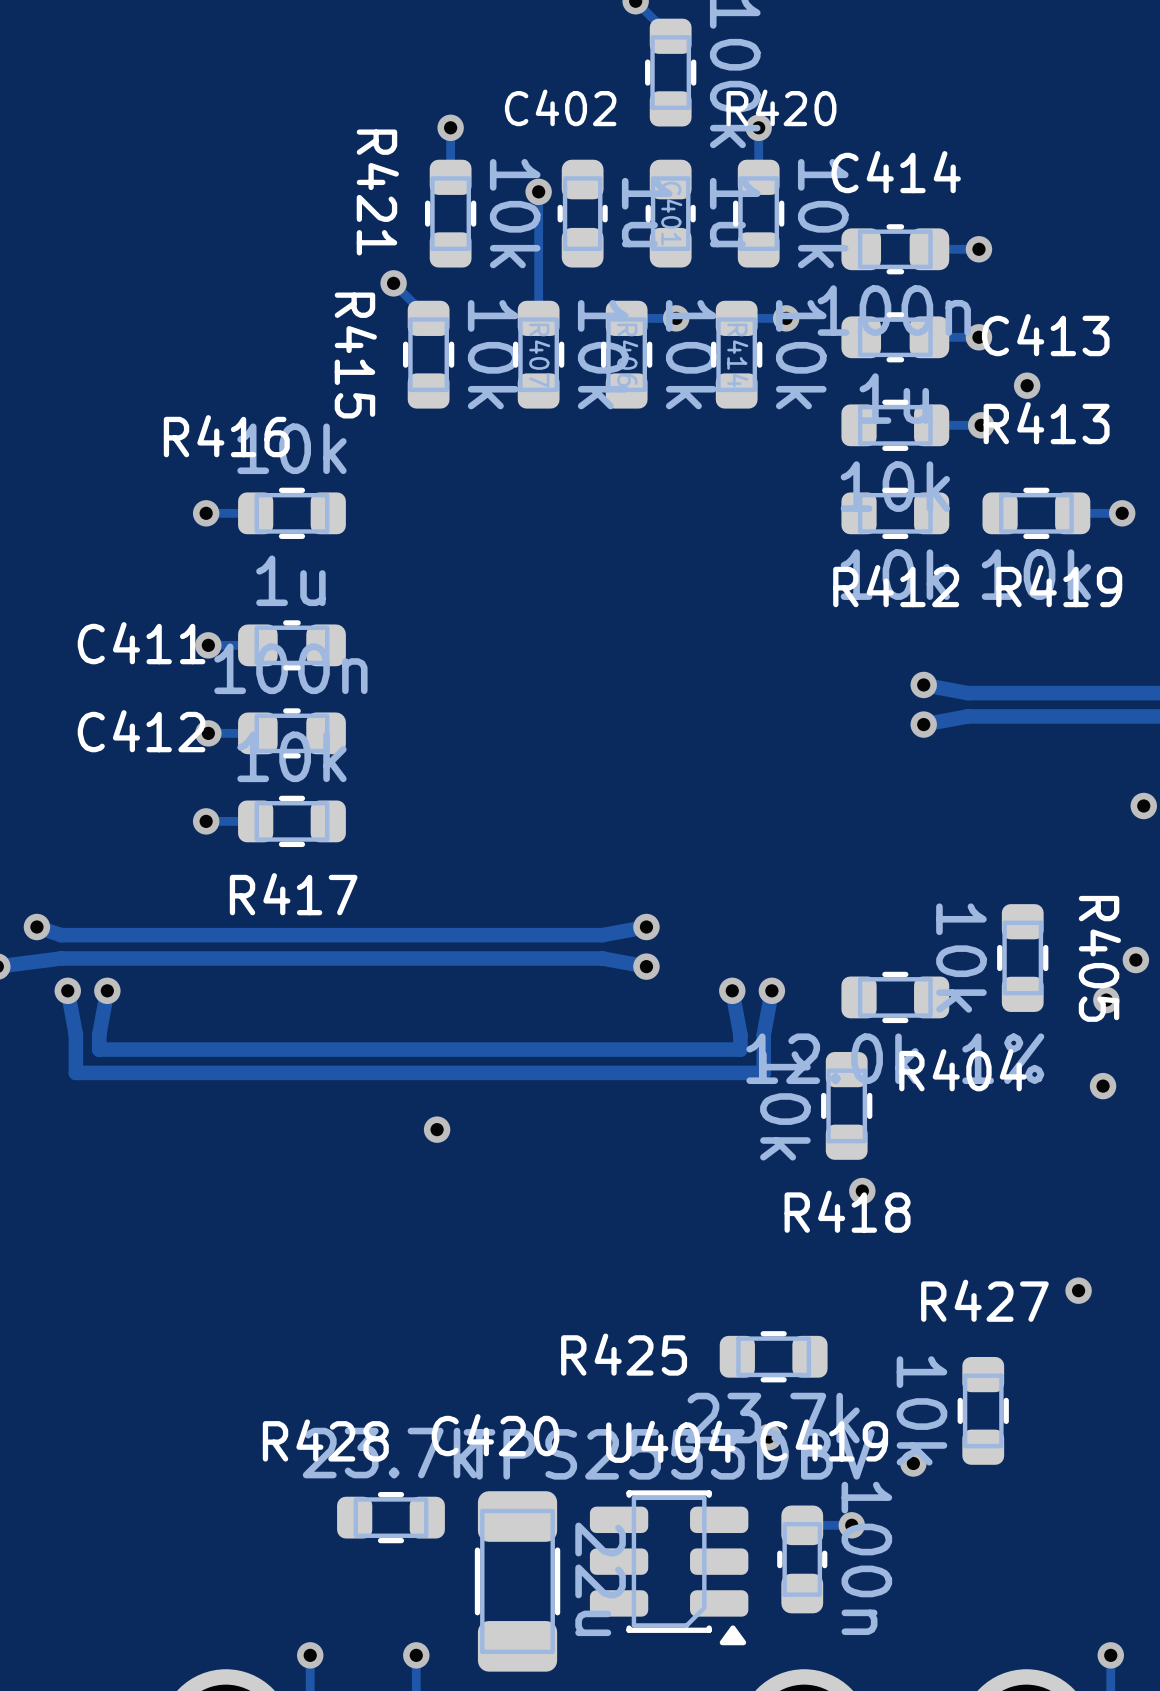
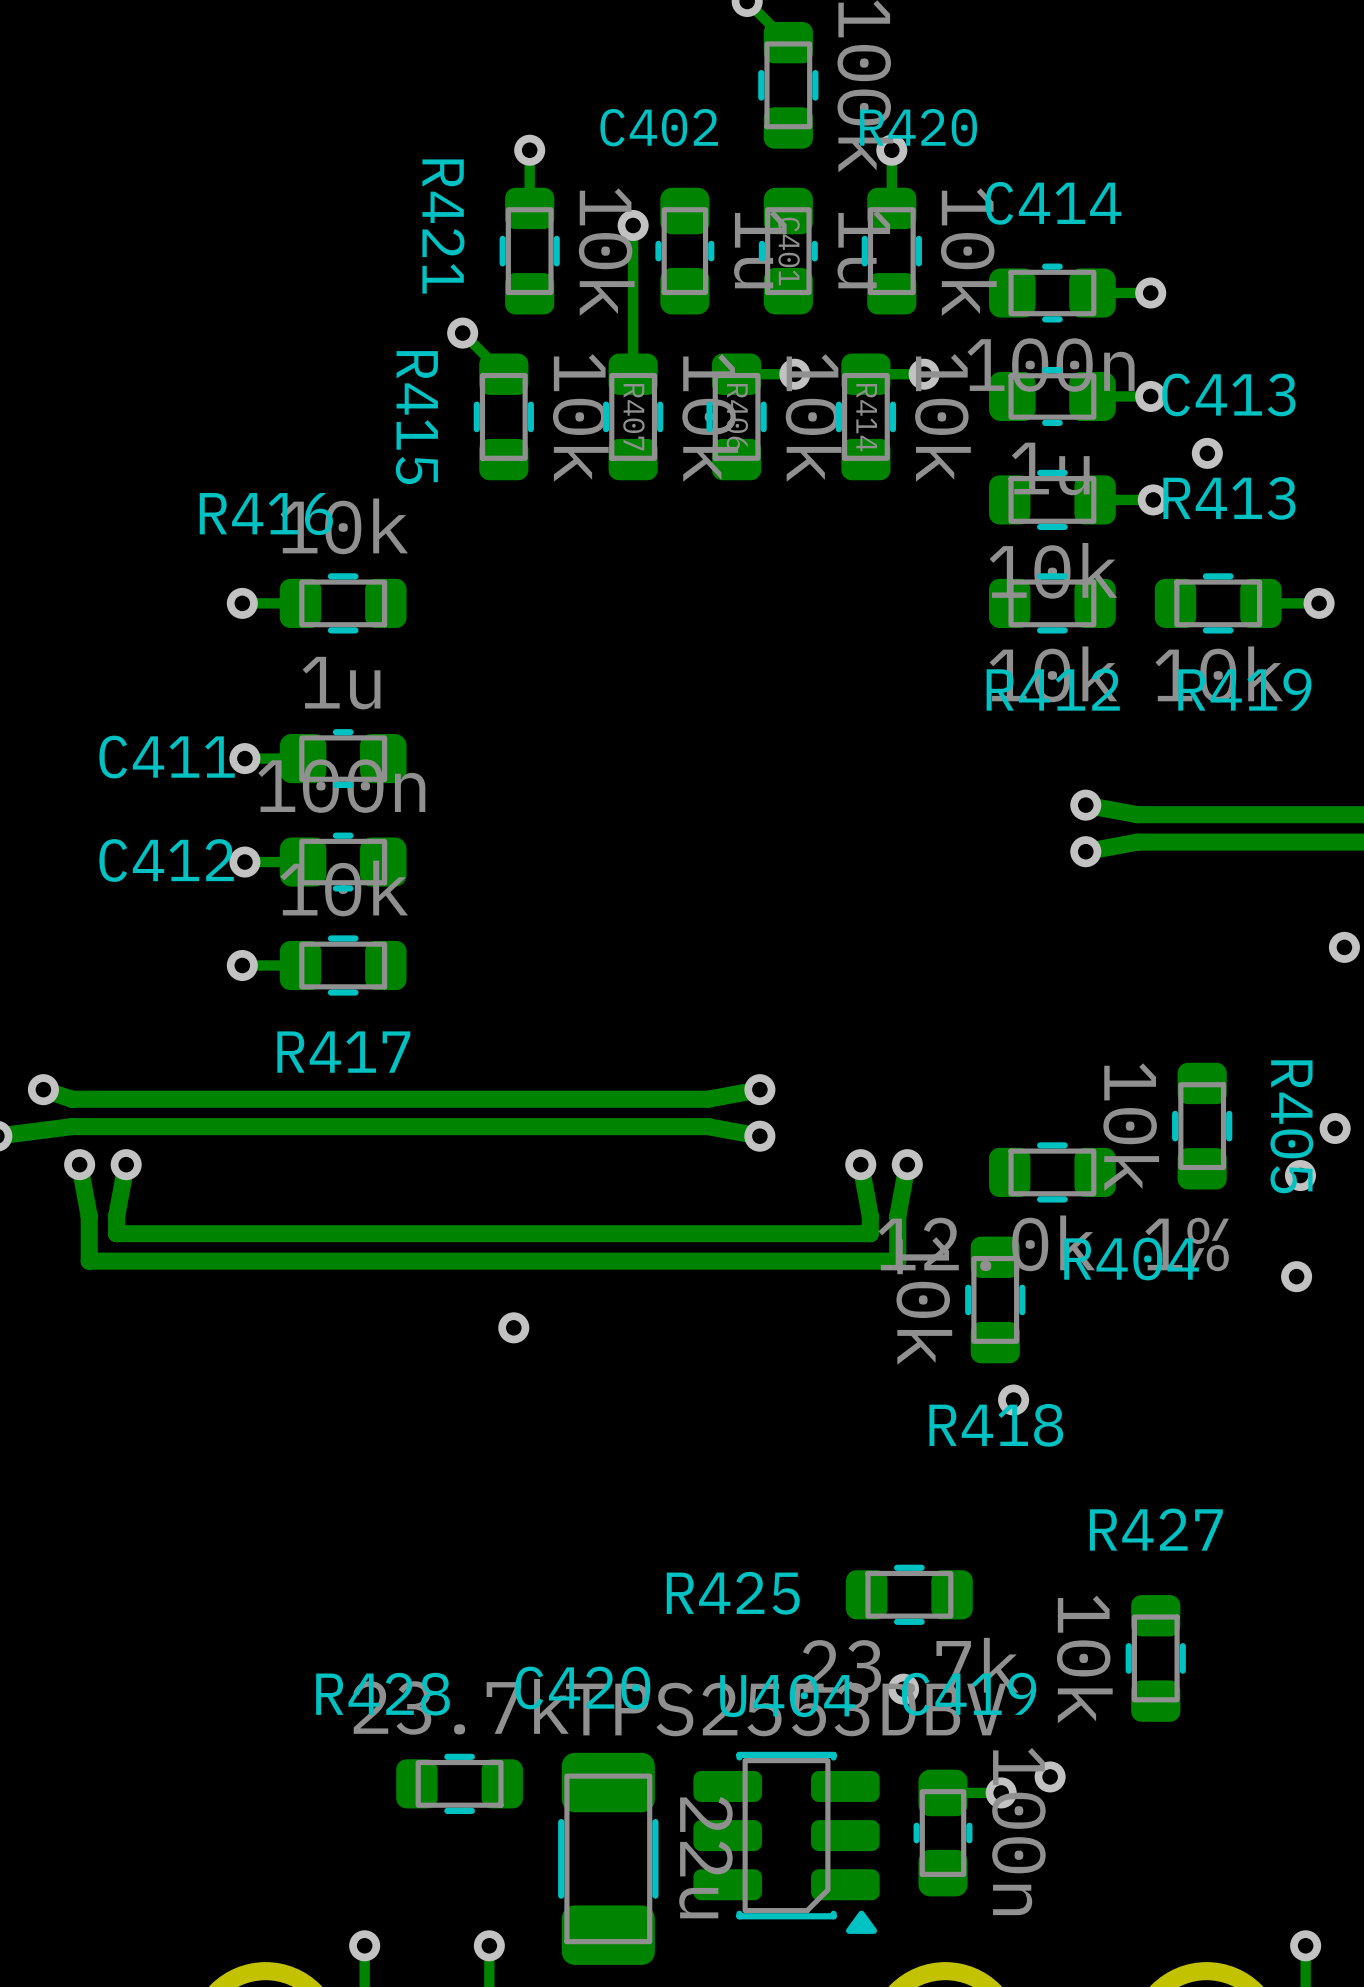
via: (1078, 1290) -> none
via position: (913, 1463) -> (1050, 1776)

